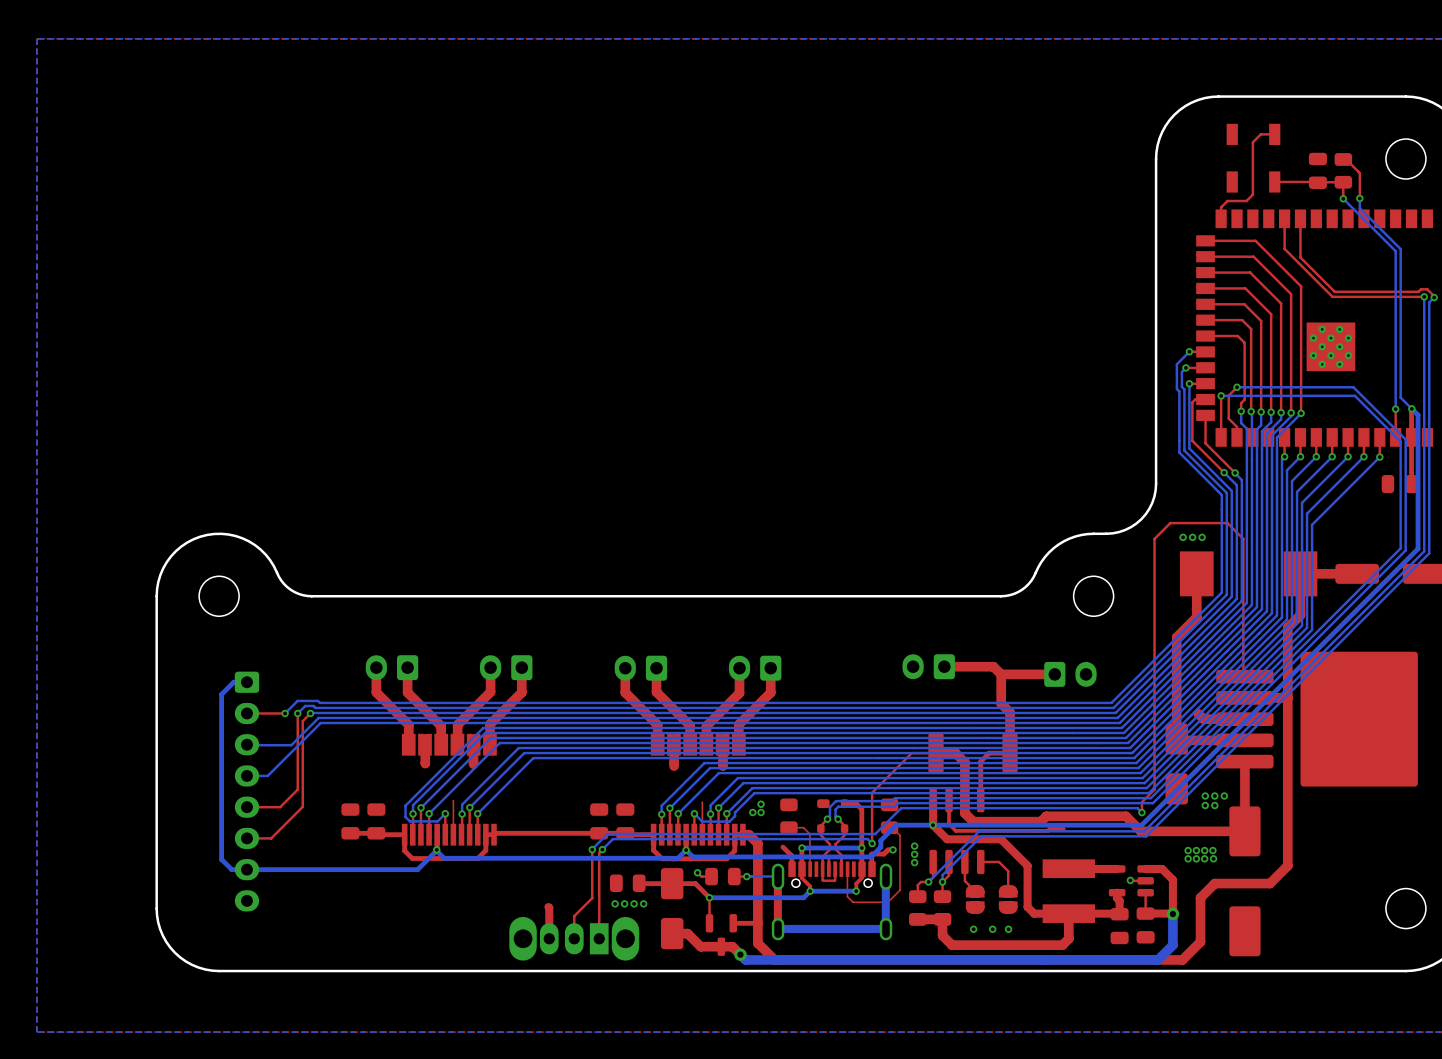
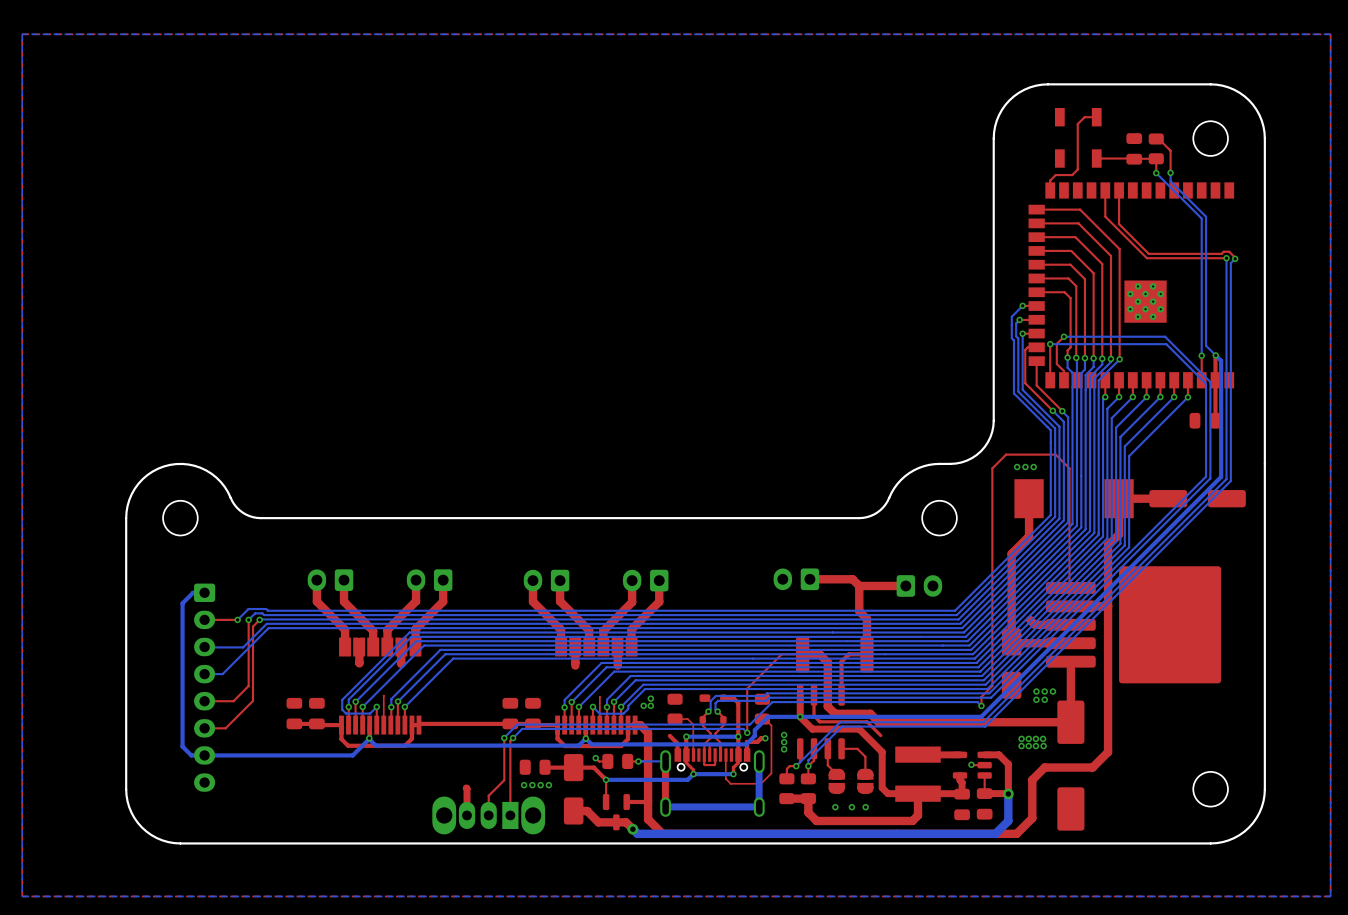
top track: (1013, 821) (1040, 821) (1046, 816) (1125, 816) (1141, 831) -> (870, 713) (878, 722) (980, 722)
top track: (1063, 828) (1010, 830) -> (880, 735) (867, 721)

